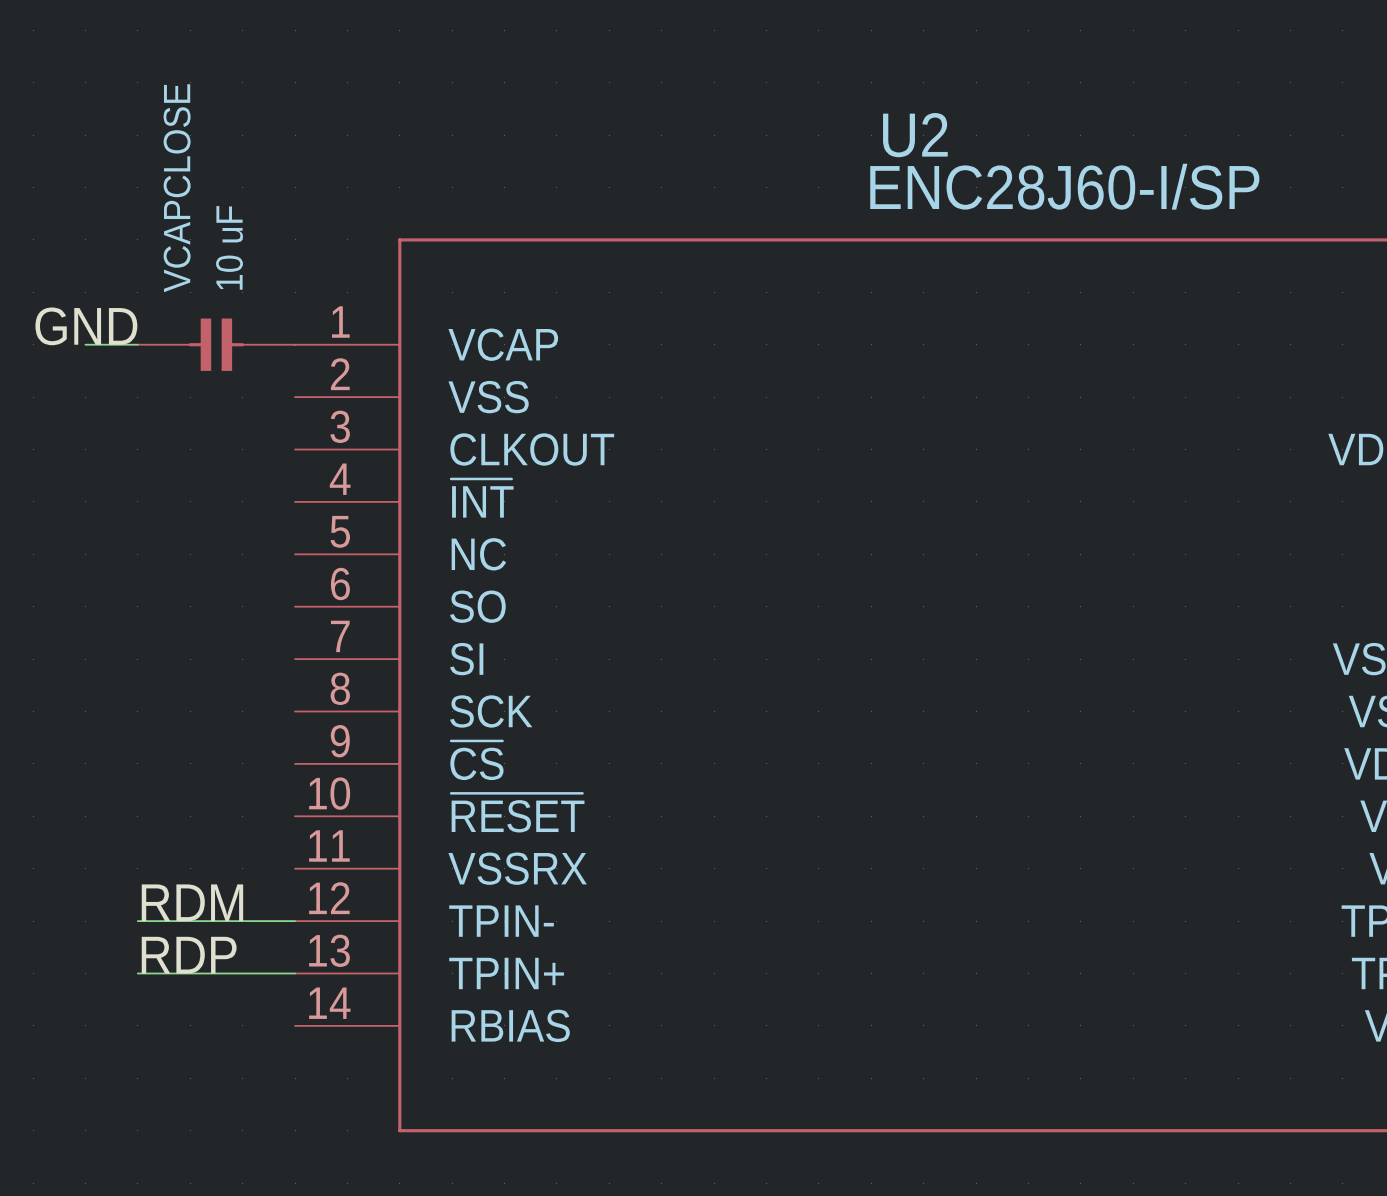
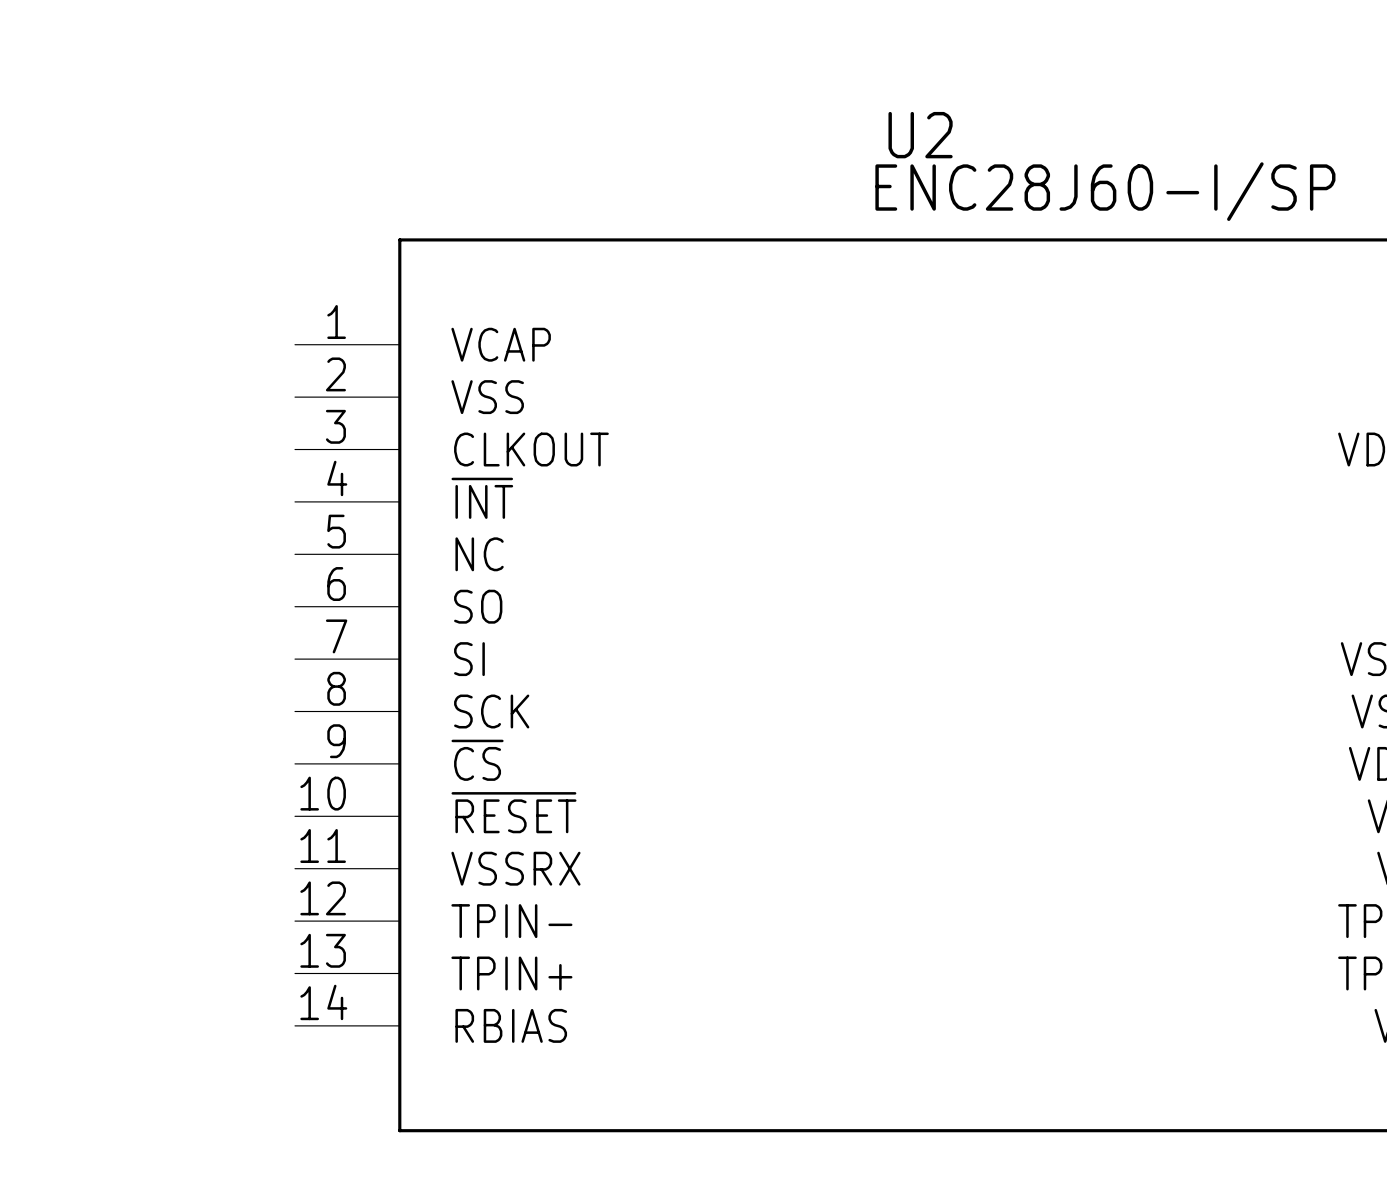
label: GND (86, 326) -> none
wire: (85, 344) (137, 344) -> none
VCAPCLOSE: 10 uF (216, 344) -> none
label: RDM (192, 902) -> none
wire: (137, 921) (295, 921) -> none
label: RDP (189, 955) -> none
wire: (137, 973) (295, 973) -> none

